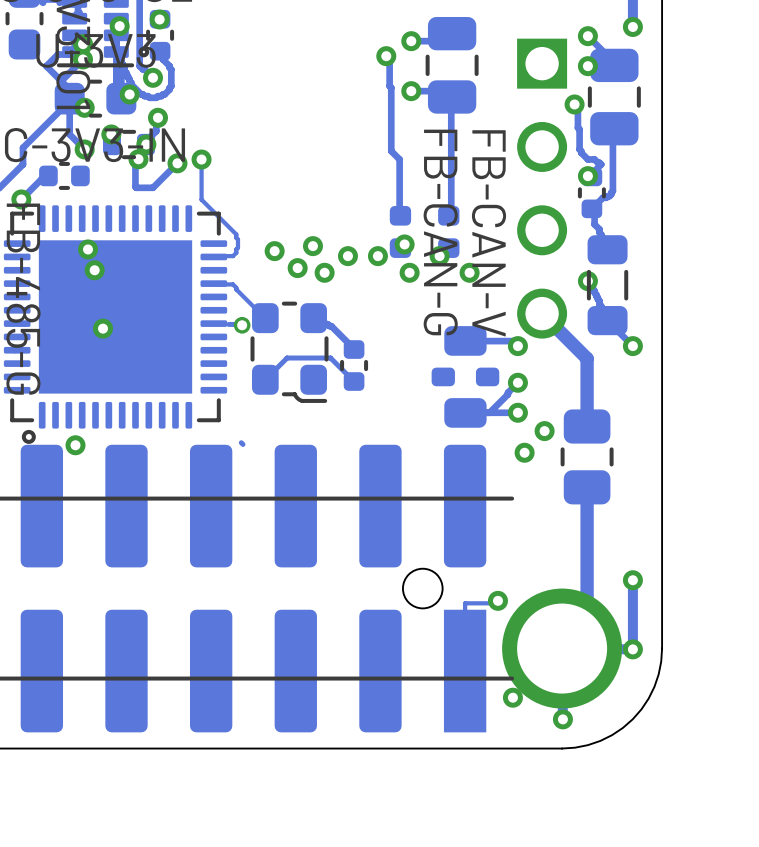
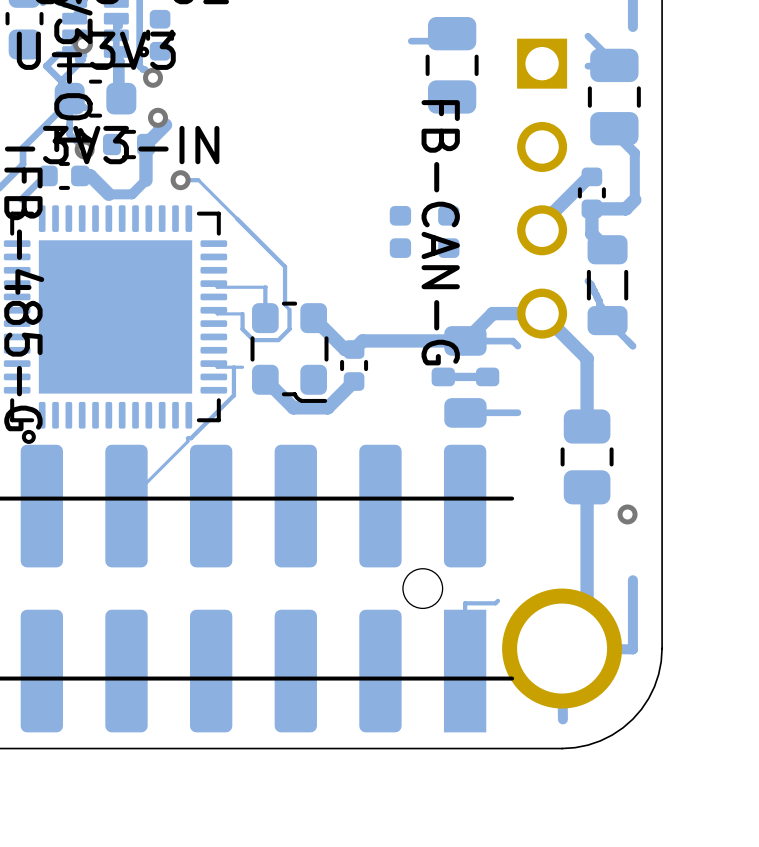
via: (159, 19) -> none
via: (119, 26) -> none
via: (632, 26) -> none
via: (587, 36) -> none
via: (411, 41) -> none
track: (159, 51) (162, 59) (171, 69) (171, 86) (164, 94) (156, 97) (141, 94) (131, 84) (121, 62) -> none
track: (386, 56) (389, 59) (389, 86) (391, 87) (391, 151) (399, 159) (399, 216) -> none
via: (386, 56) -> none
via: (83, 59) -> none
via: (587, 66) -> none
track: (411, 91) (437, 91) (451, 97) (451, 209) (447, 216) -> none
via: (411, 91) -> none
via: (129, 94) -> none
track: (574, 104) (577, 107) (579, 149) (587, 159) (594, 159) (601, 164) (591, 176) (587, 176) -> none
via: (574, 104) -> none
via: (84, 107) -> none
track: none -> (165, 124) (145, 144) (145, 180) (131, 194) (108, 194) (90, 175) (80, 175)
track: (614, 129) (612, 132) (612, 191) (609, 196) (602, 197) (591, 209) (594, 214) (594, 224) (599, 229) (607, 249) -> (614, 128) (614, 132) (634, 153) (634, 199) (625, 208) (591, 208) (591, 234) (607, 249)
via: (111, 134) -> none
via: (146, 144) -> none
track: (138, 159) (135, 162) (136, 187) (152, 187) (177, 163) -> none
via: (138, 159) -> none
track: (201, 159) (201, 199) (236, 234) (237, 239) (237, 247) (232, 256) (214, 257) -> none
via: (201, 159) -> none
via position: (177, 163) -> (180, 180)
via: (587, 176) -> none
track: none -> (591, 176) (589, 176) (542, 223) (542, 230)
track: none -> (180, 180) (198, 180) (285, 266) (285, 305) (289, 309) (289, 329) (278, 340) (253, 340) (242, 329) (242, 313) (217, 313) (213, 310)
via: (21, 199) -> none
FB-CAN-V name: FB-CAN-V (488, 233) -> none
via: (404, 244) -> none
via: (312, 246) -> none
via: (88, 249) -> none
via: (274, 251) -> none
via: (347, 256) -> none
via: (377, 256) -> none
via: (439, 256) -> none
via: (297, 268) -> none
via: (94, 270) -> none
via: (324, 272) -> none
via: (409, 272) -> none
via: (469, 272) -> none
via: (587, 281) -> none
track: (214, 284) (232, 284) (264, 317) -> (213, 283) (217, 287) (266, 287)
track: none -> (265, 287) (265, 318)
track: (312, 317) (331, 326) (354, 349) -> (313, 318) (345, 349) (354, 349) (362, 340) (465, 340) (492, 313) (542, 313)
track: (241, 324) (228, 324) -> none
via: (242, 325) -> none
via: (103, 328) -> none
via: (517, 346) -> none
via: (632, 346) -> none
track: none -> (213, 363) (217, 367) (242, 367)
track: none -> (233, 367) (233, 395) (191, 438) (187, 438) (187, 441) (124, 504) (126, 506)
track: none -> (487, 376) (443, 376)
track: (265, 379) (287, 358) (330, 358) (354, 381) -> (265, 379) (293, 407) (327, 407) (354, 381)
track: (517, 382) (489, 412) -> none
via: (517, 382) -> none
via: (517, 412) -> none
via: (544, 431) -> none
track: (241, 442) (242, 444) -> none
via: (75, 445) -> none
via: (524, 452) -> none
via: none -> (627, 514)
via: (632, 580) -> none
via: (497, 600) -> none
via: (632, 649) -> none
via: (512, 697) -> none
via: (562, 719) -> none

